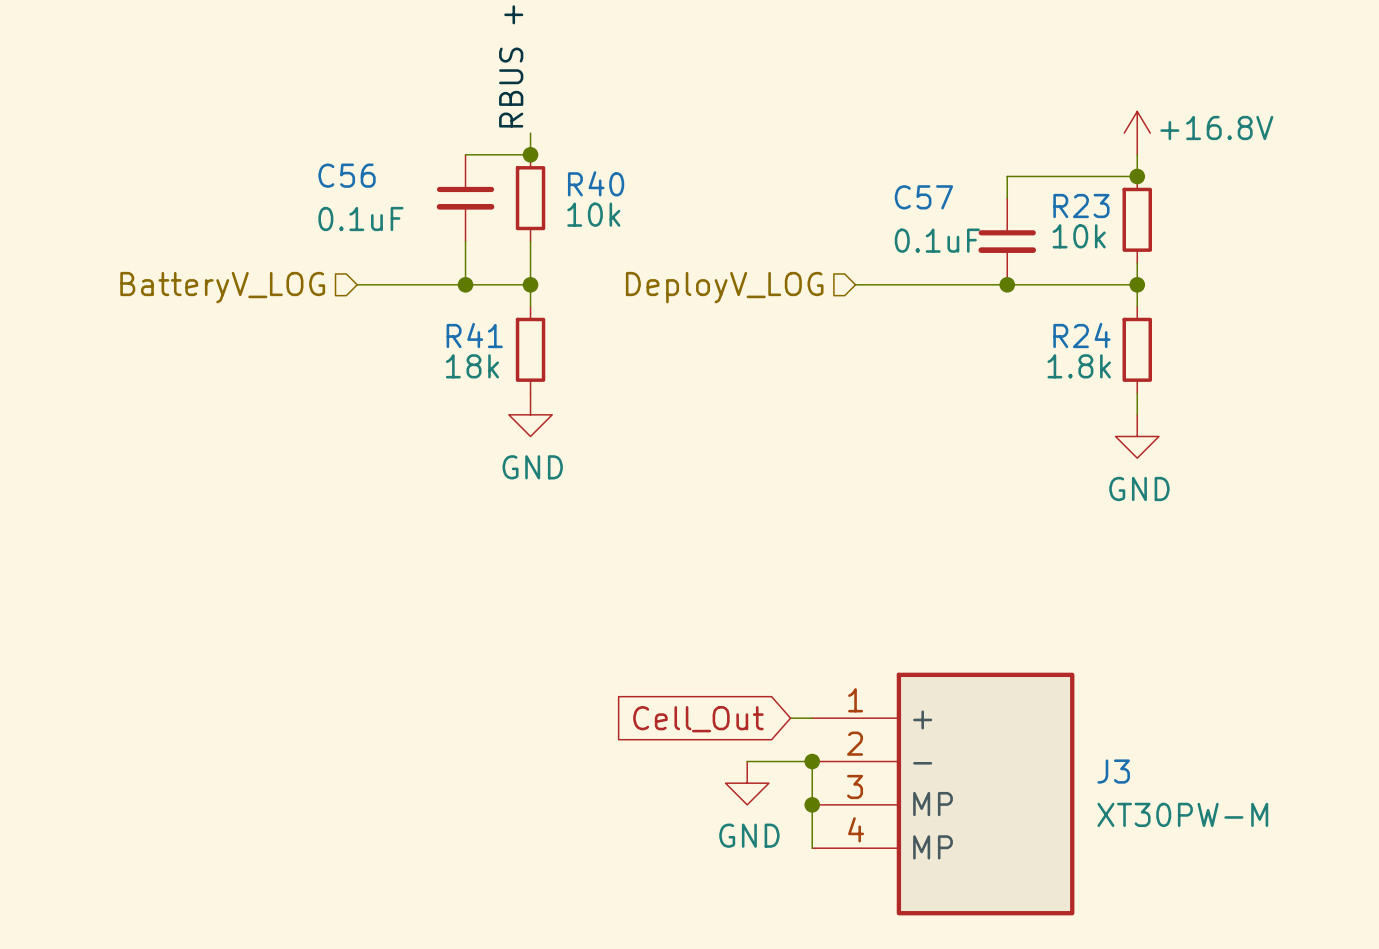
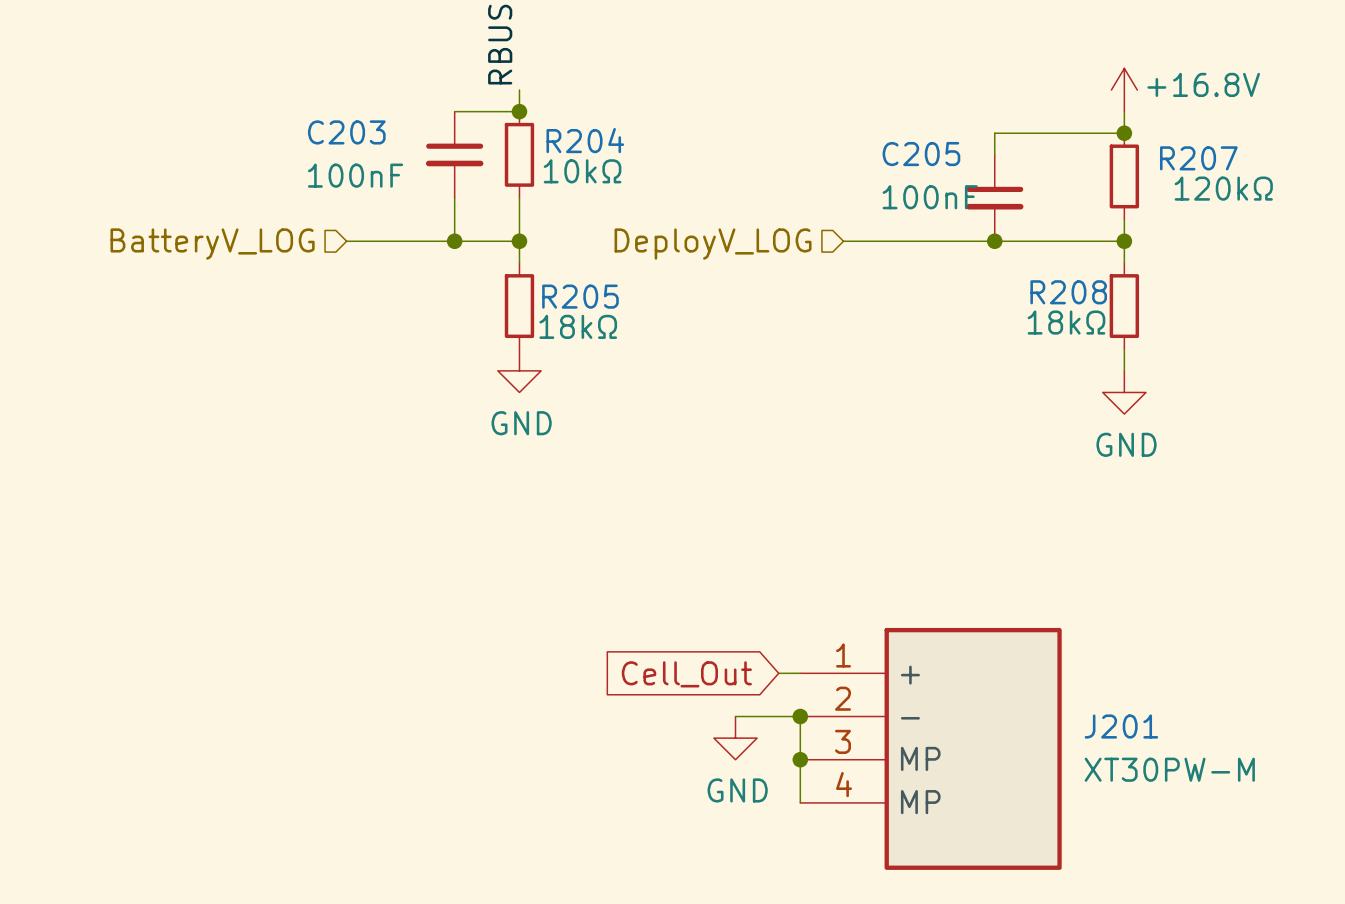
C56 name: C56 (347, 175) -> C203 (346, 132)
R40 name: R40 (596, 183) -> R204 (585, 140)
C57 name: C57 (923, 197) -> C205 (921, 154)
R23 name: R23 (1081, 206) -> R207 (1198, 158)
R40 value: 10k (593, 214) -> 10kΩ (582, 171)
C56 value: 0.1uF (360, 219) -> 100nF (355, 175)
R23 value: 10k (1079, 236) -> 120kΩ (1223, 188)
C57 value: 0.1uF (937, 240) -> 100nF (930, 197)
R41 name: R41 (474, 335) -> R205 (580, 296)
R24 name: R24 (1081, 335) -> R208 (1068, 292)
R41 value: 18k (472, 366) -> 18kΩ (578, 326)
R24 value: 1.8k (1079, 366) -> 18kΩ (1066, 322)
J3 name: J3 (1113, 771) -> J201 (1121, 726)

